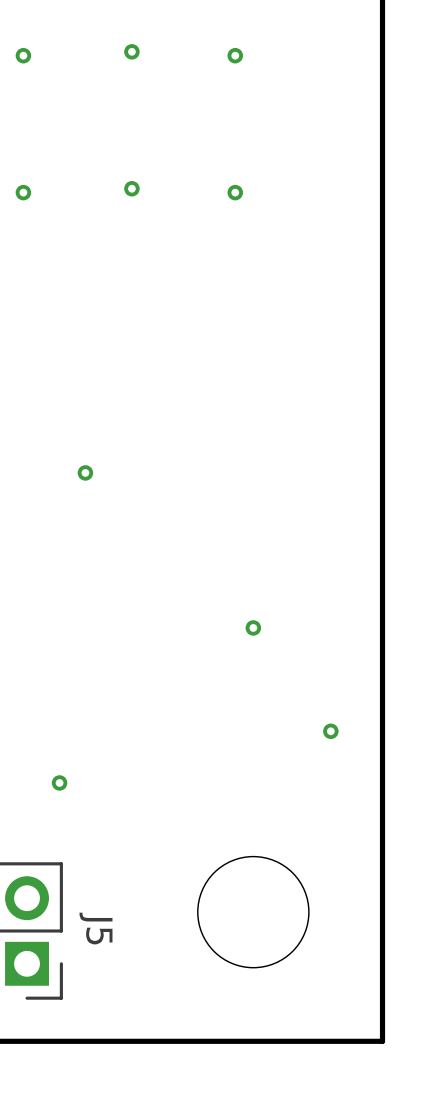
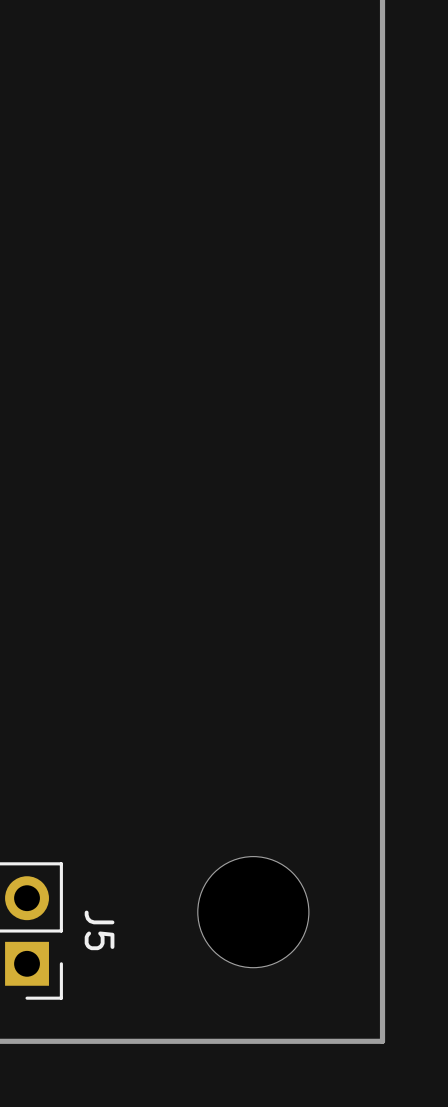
via: (131, 51) -> none
via: (23, 55) -> none
via: (235, 55) -> none
via: (131, 188) -> none
via: (23, 192) -> none
via: (235, 192) -> none
via: (85, 472) -> none
via: (253, 627) -> none
via: (330, 731) -> none
via: (59, 782) -> none

